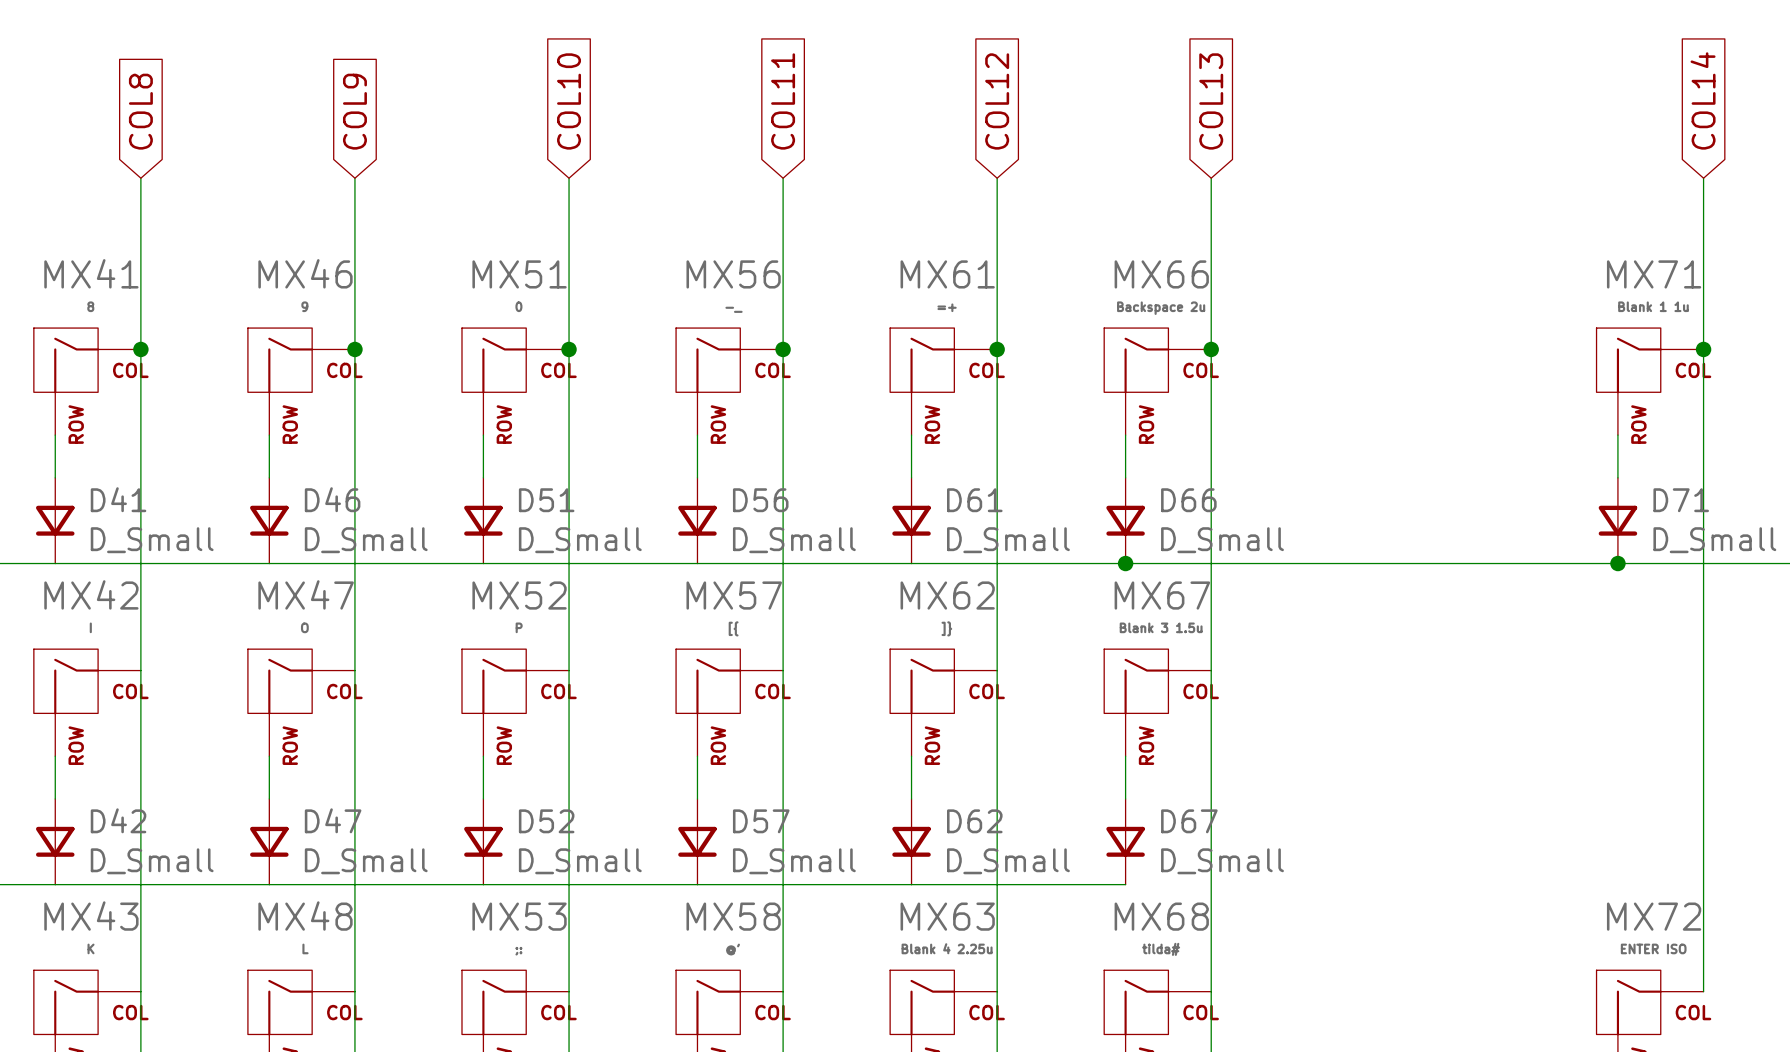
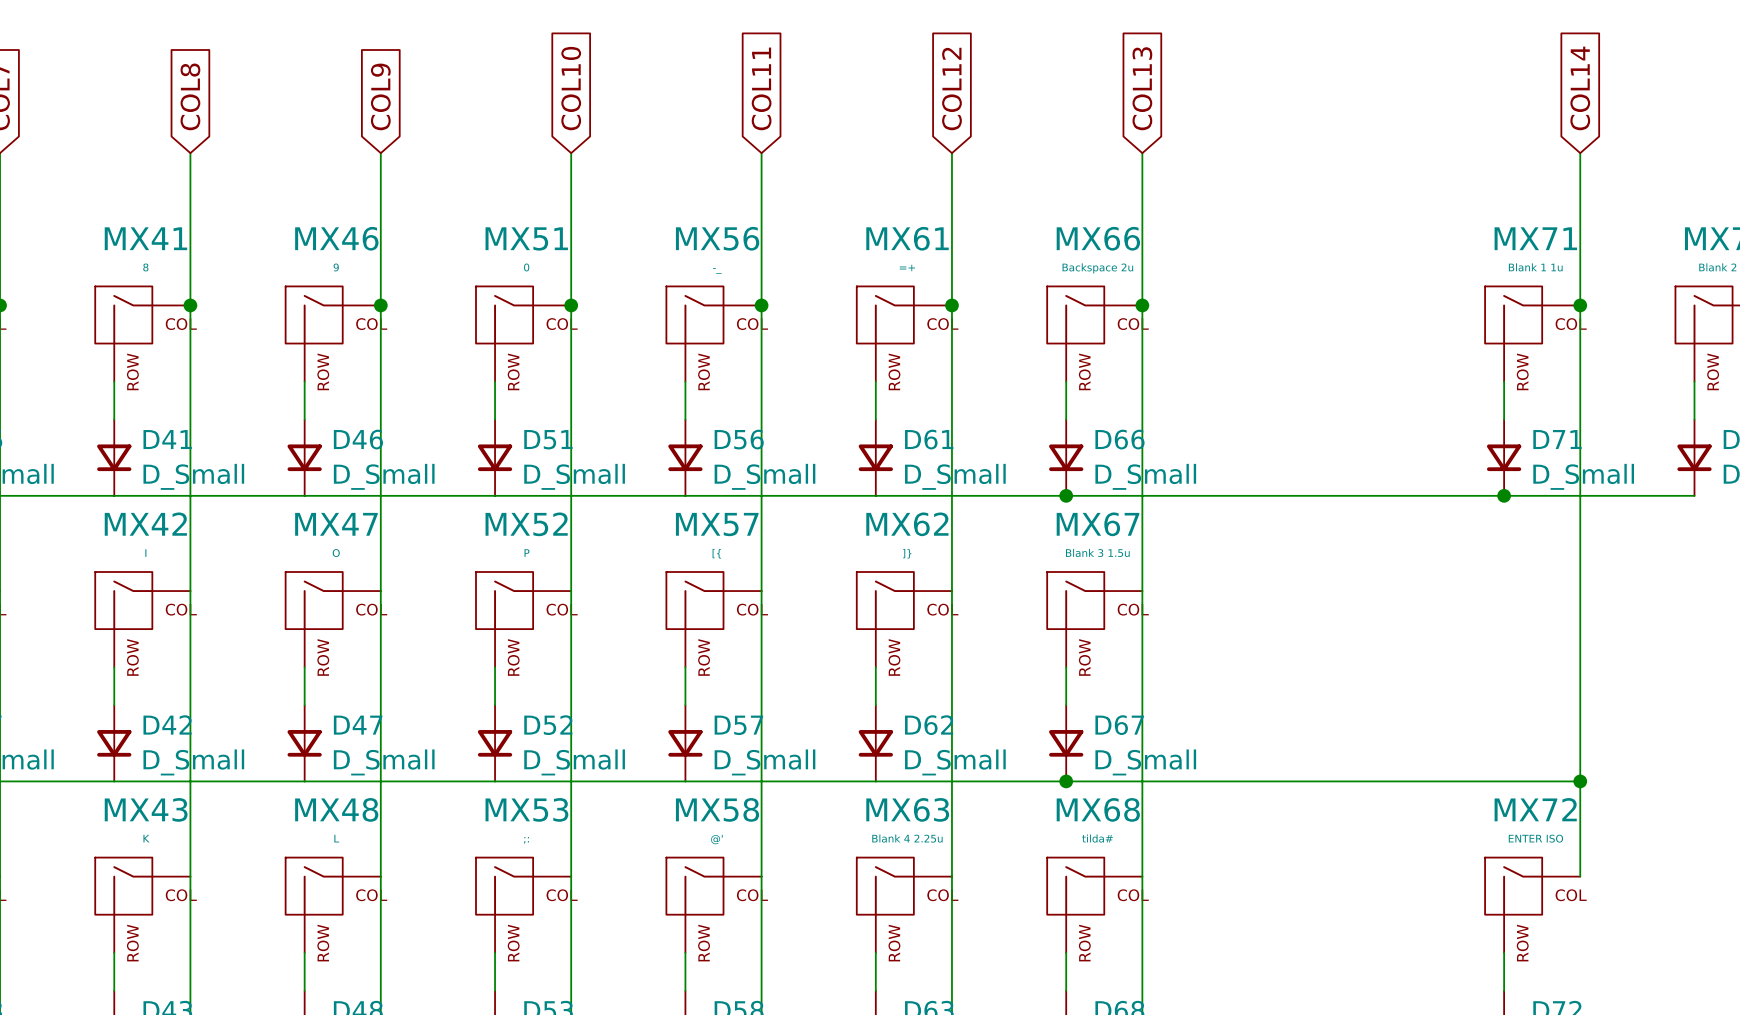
wire: none -> (1066, 781) (1580, 781)
junction: none -> (1066, 781)
junction: none -> (1580, 781)

